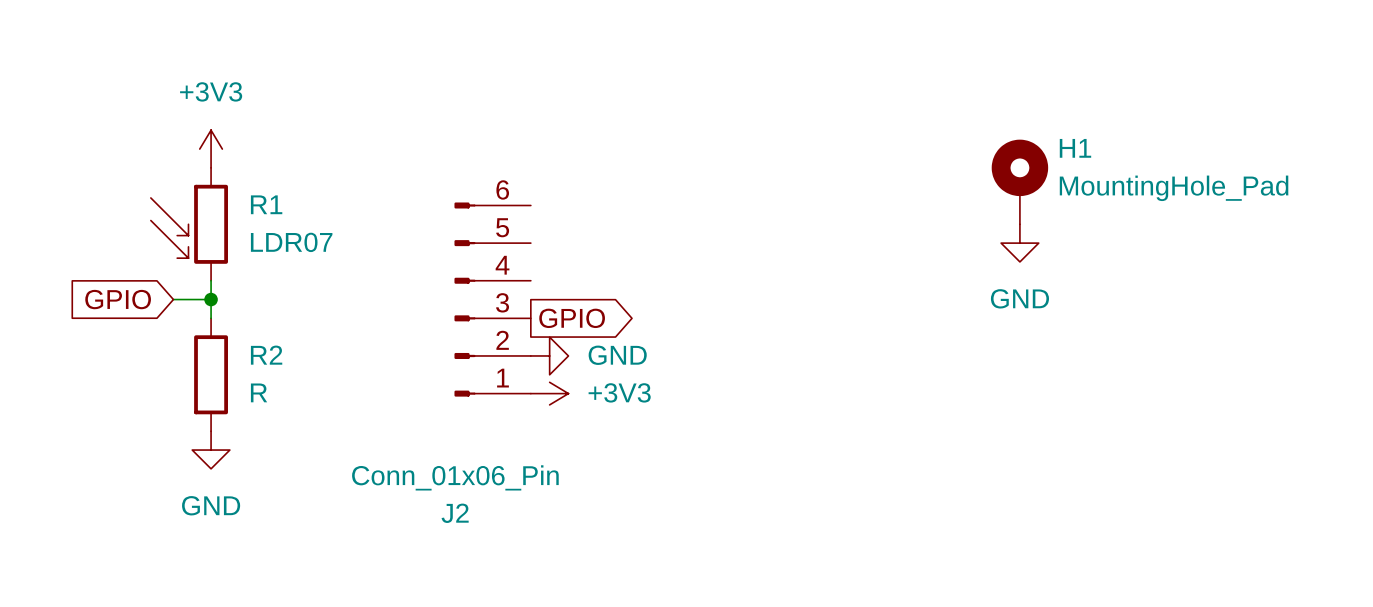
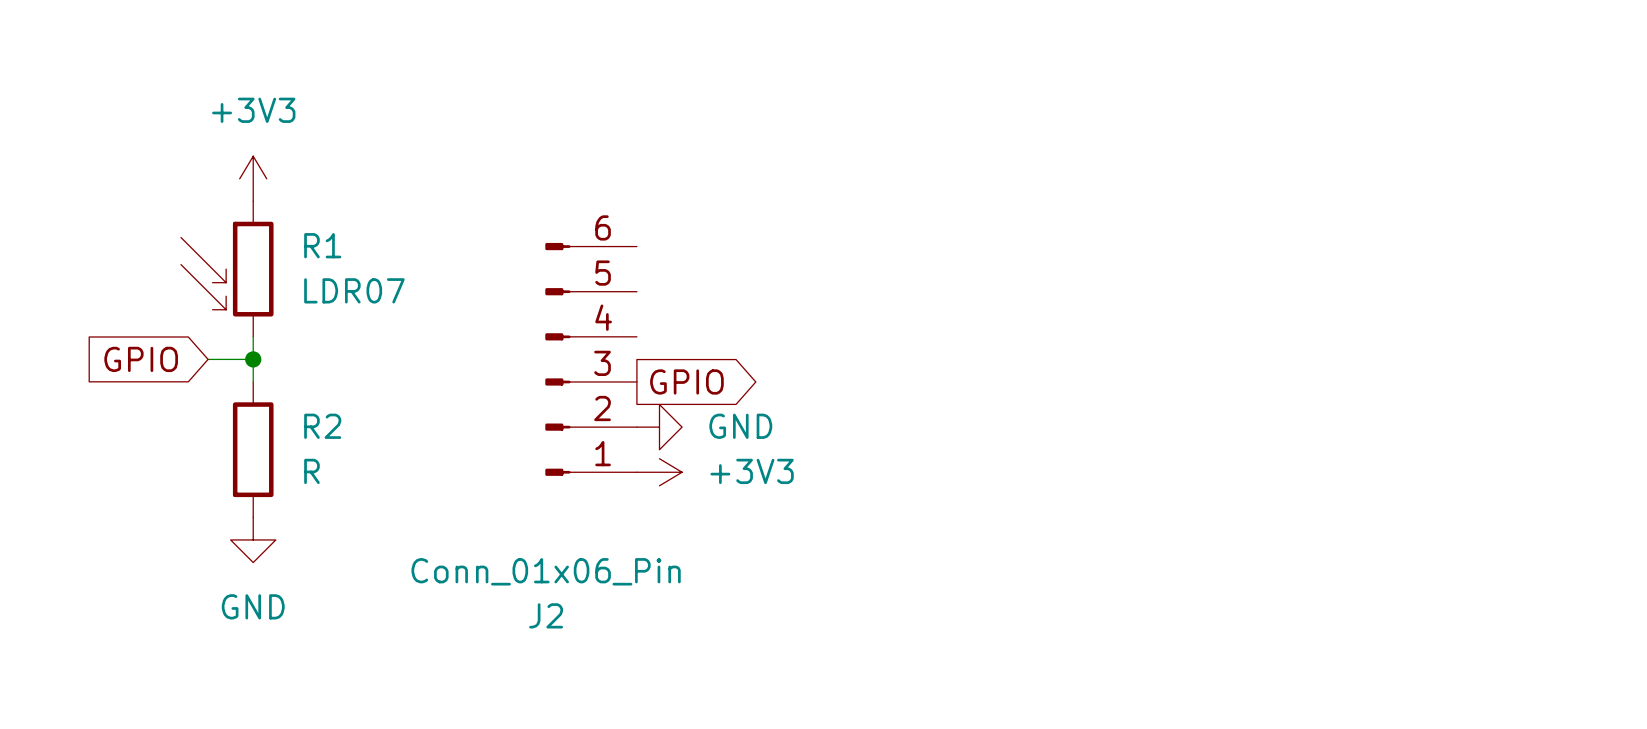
H1: MountingHole_Pad (1019, 181) -> none
power symbol: GND (1019, 243) -> none

